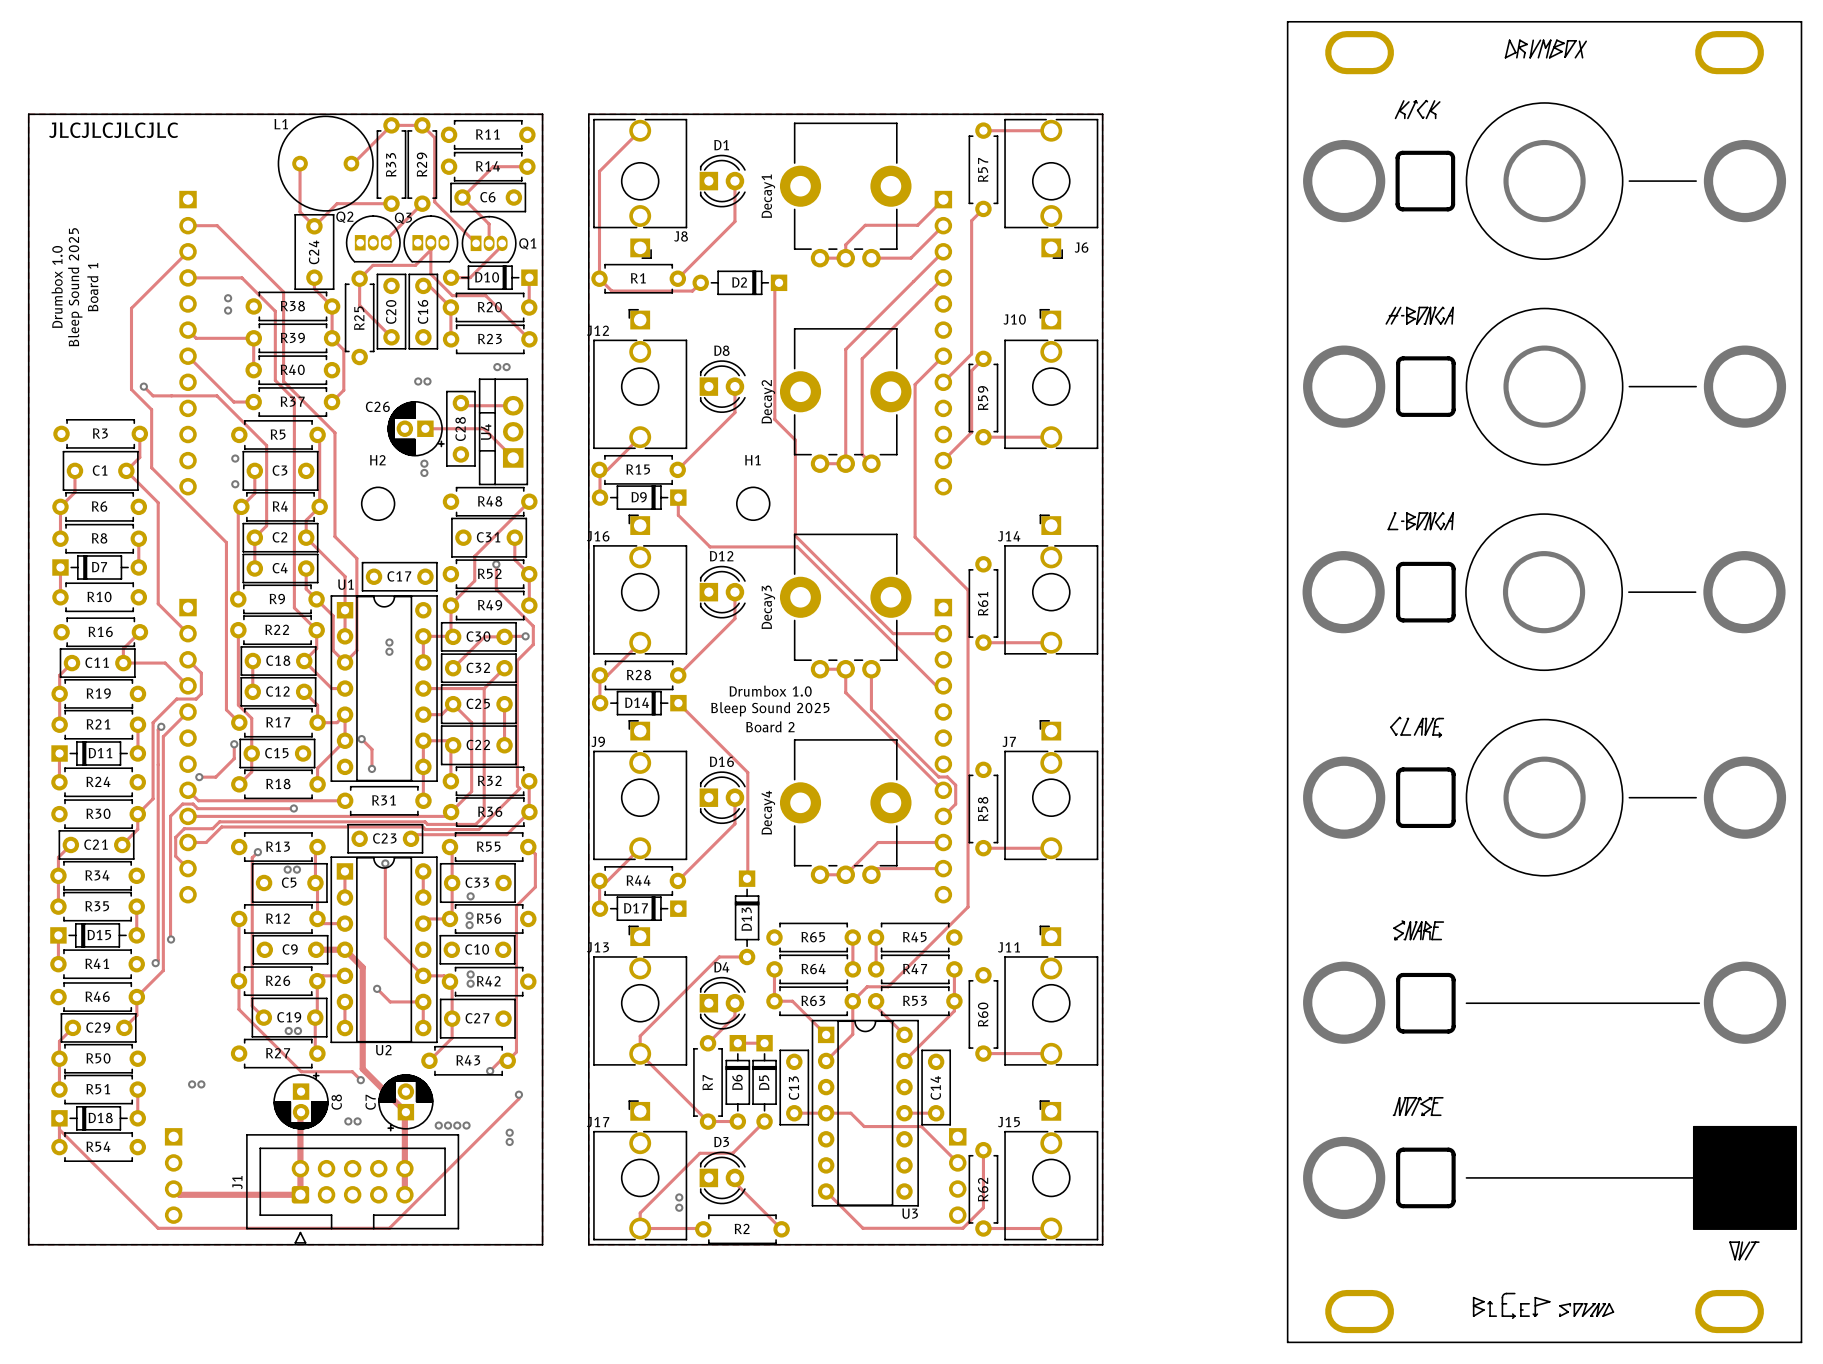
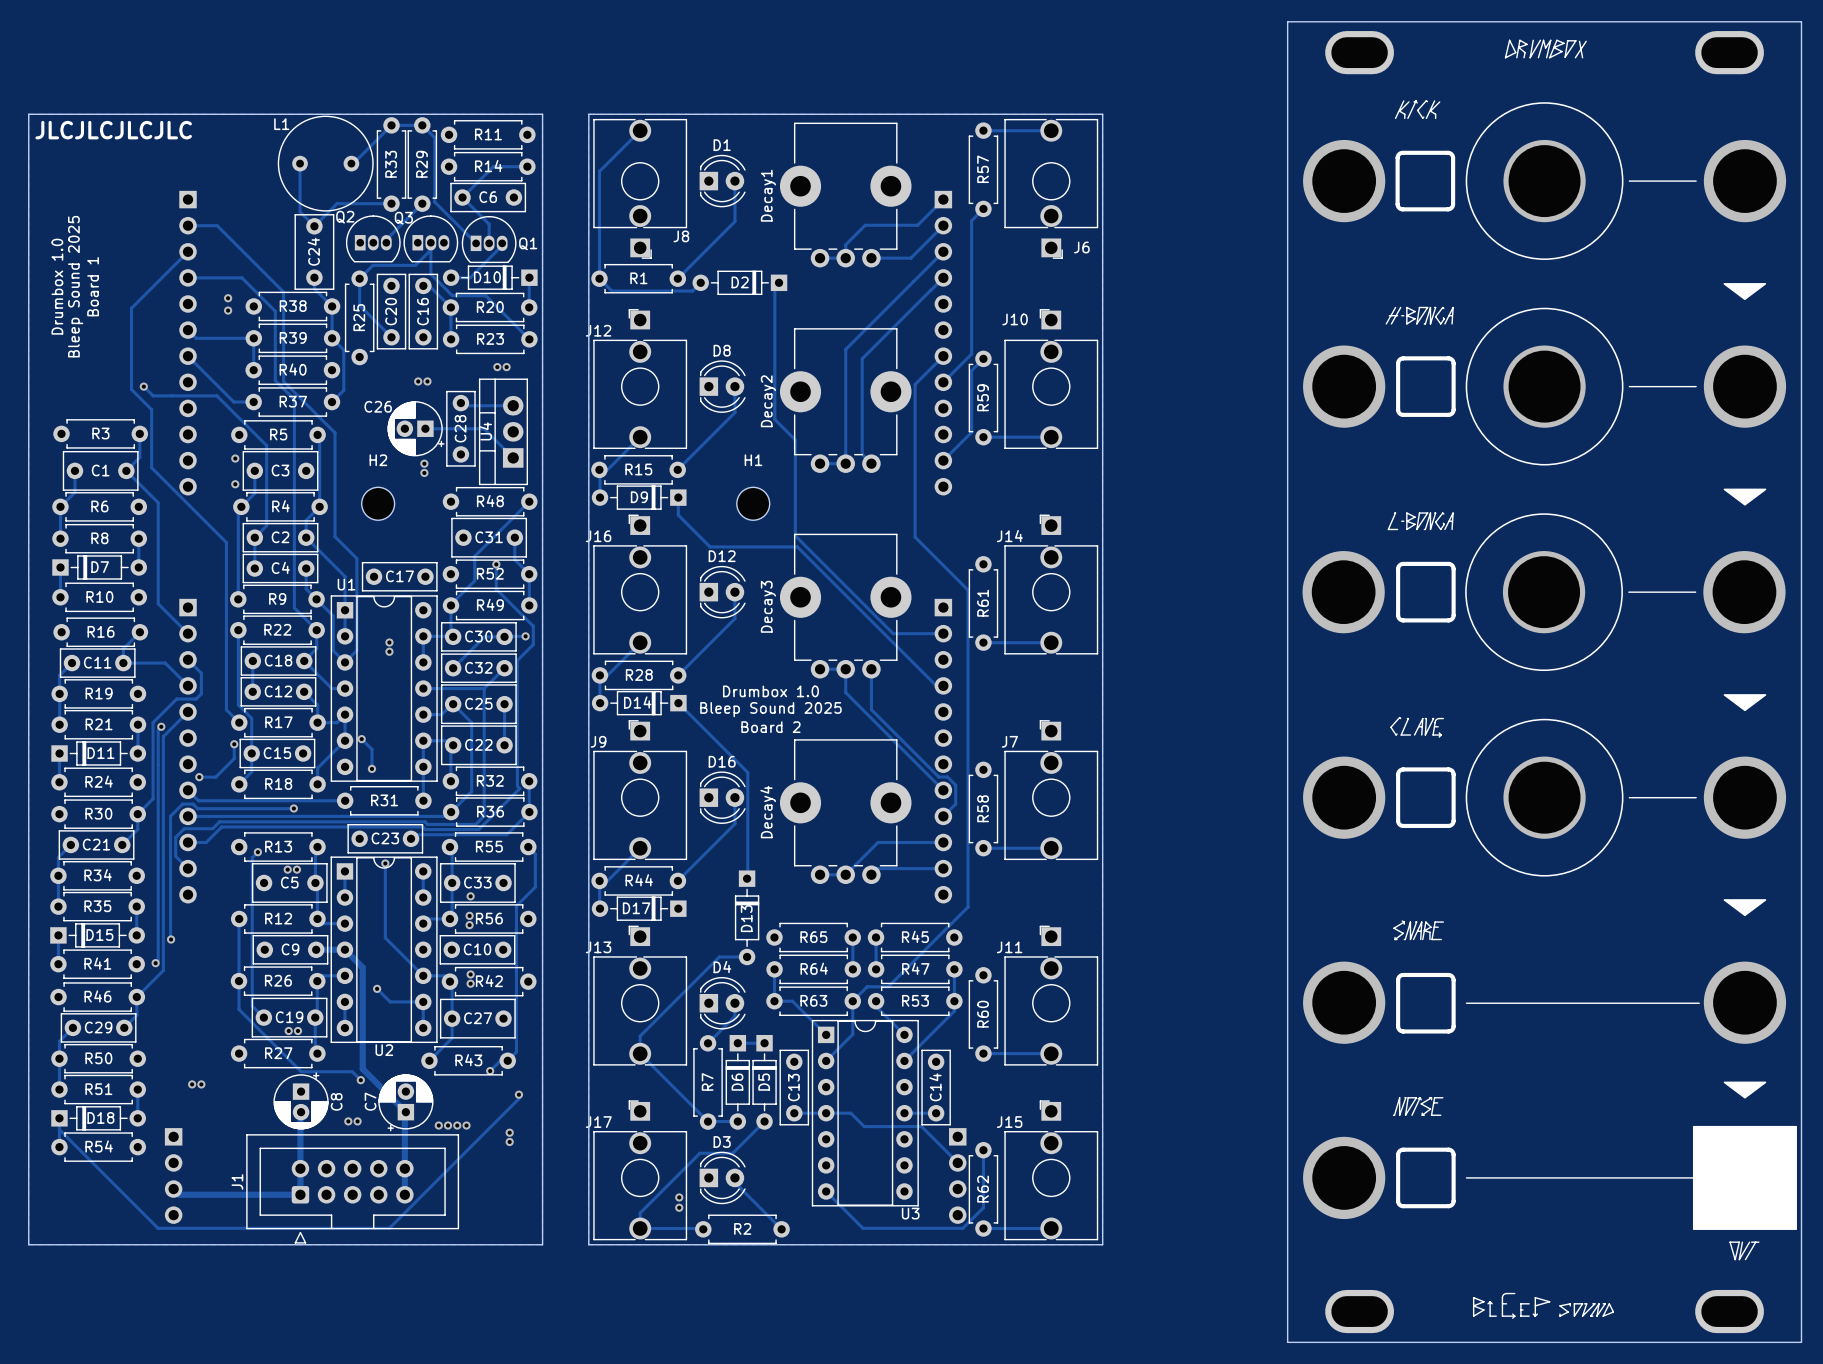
drawing: none -> [1723, 283, 1767, 301]
drawing: none -> [1723, 488, 1767, 506]
drawing: none -> [1723, 694, 1767, 712]
drawing: none -> [1723, 899, 1767, 917]
drawing: none -> [1723, 1081, 1767, 1099]

